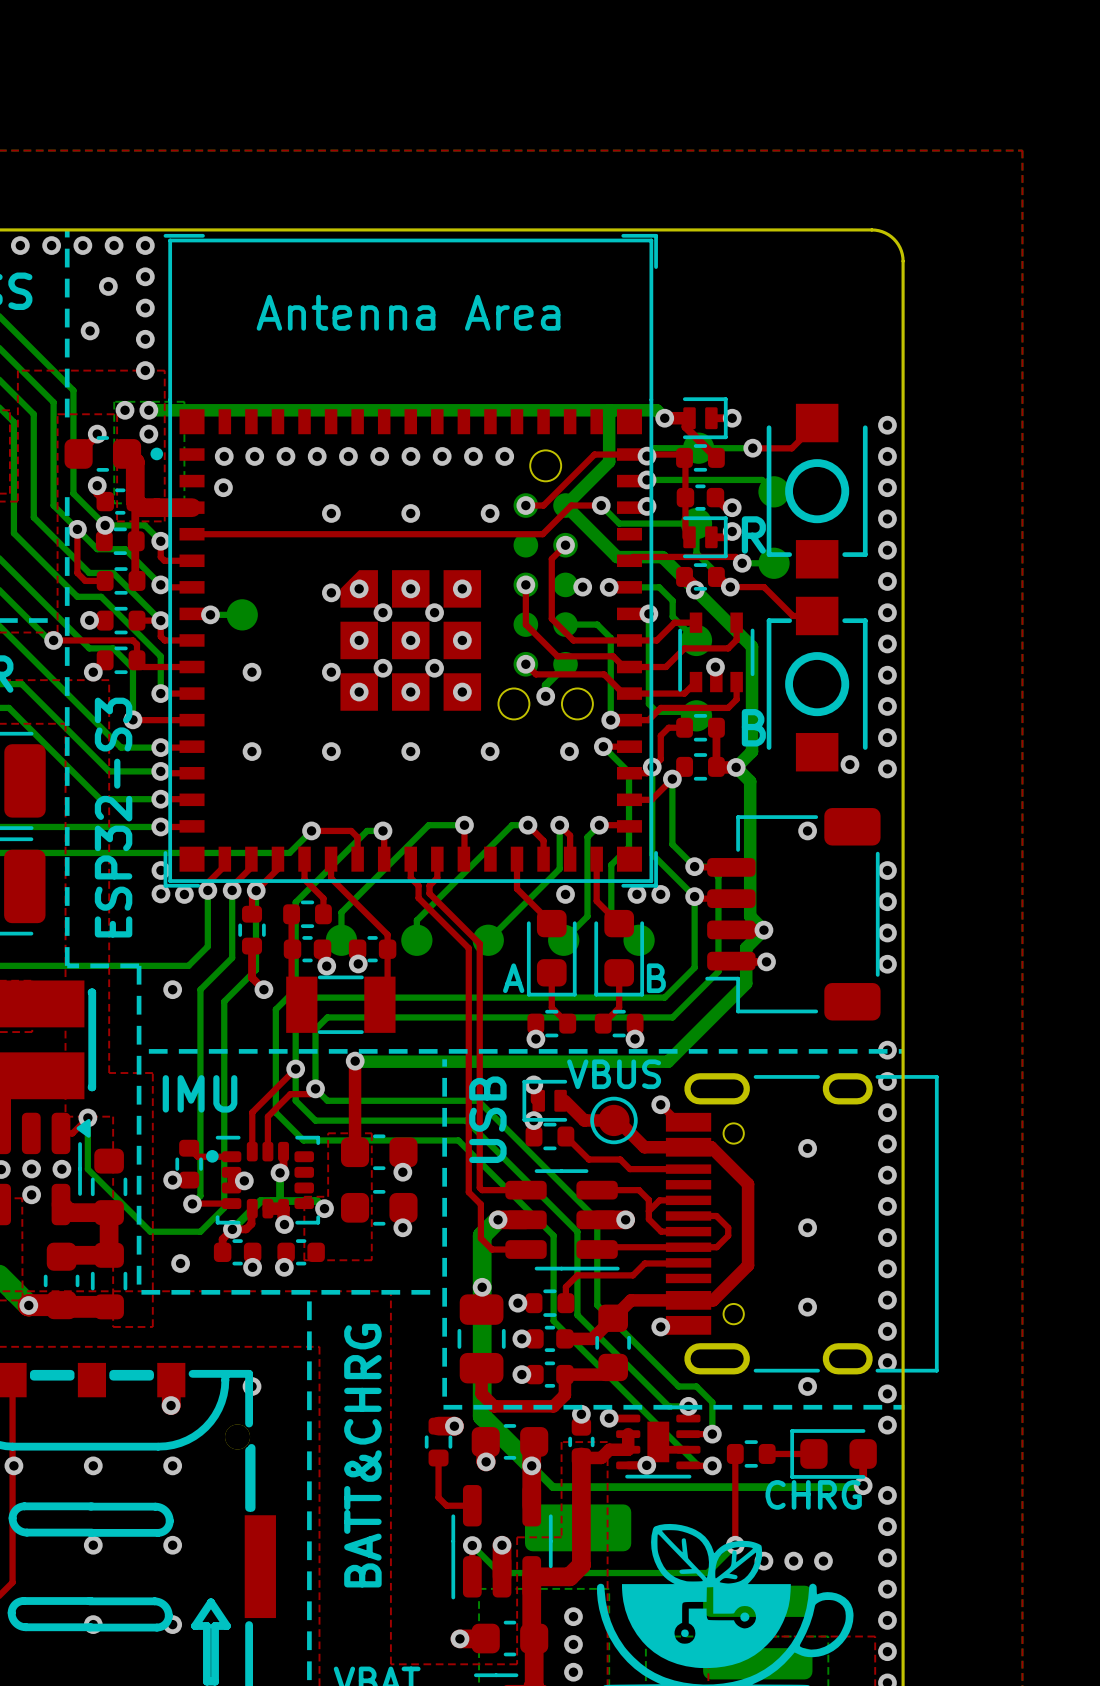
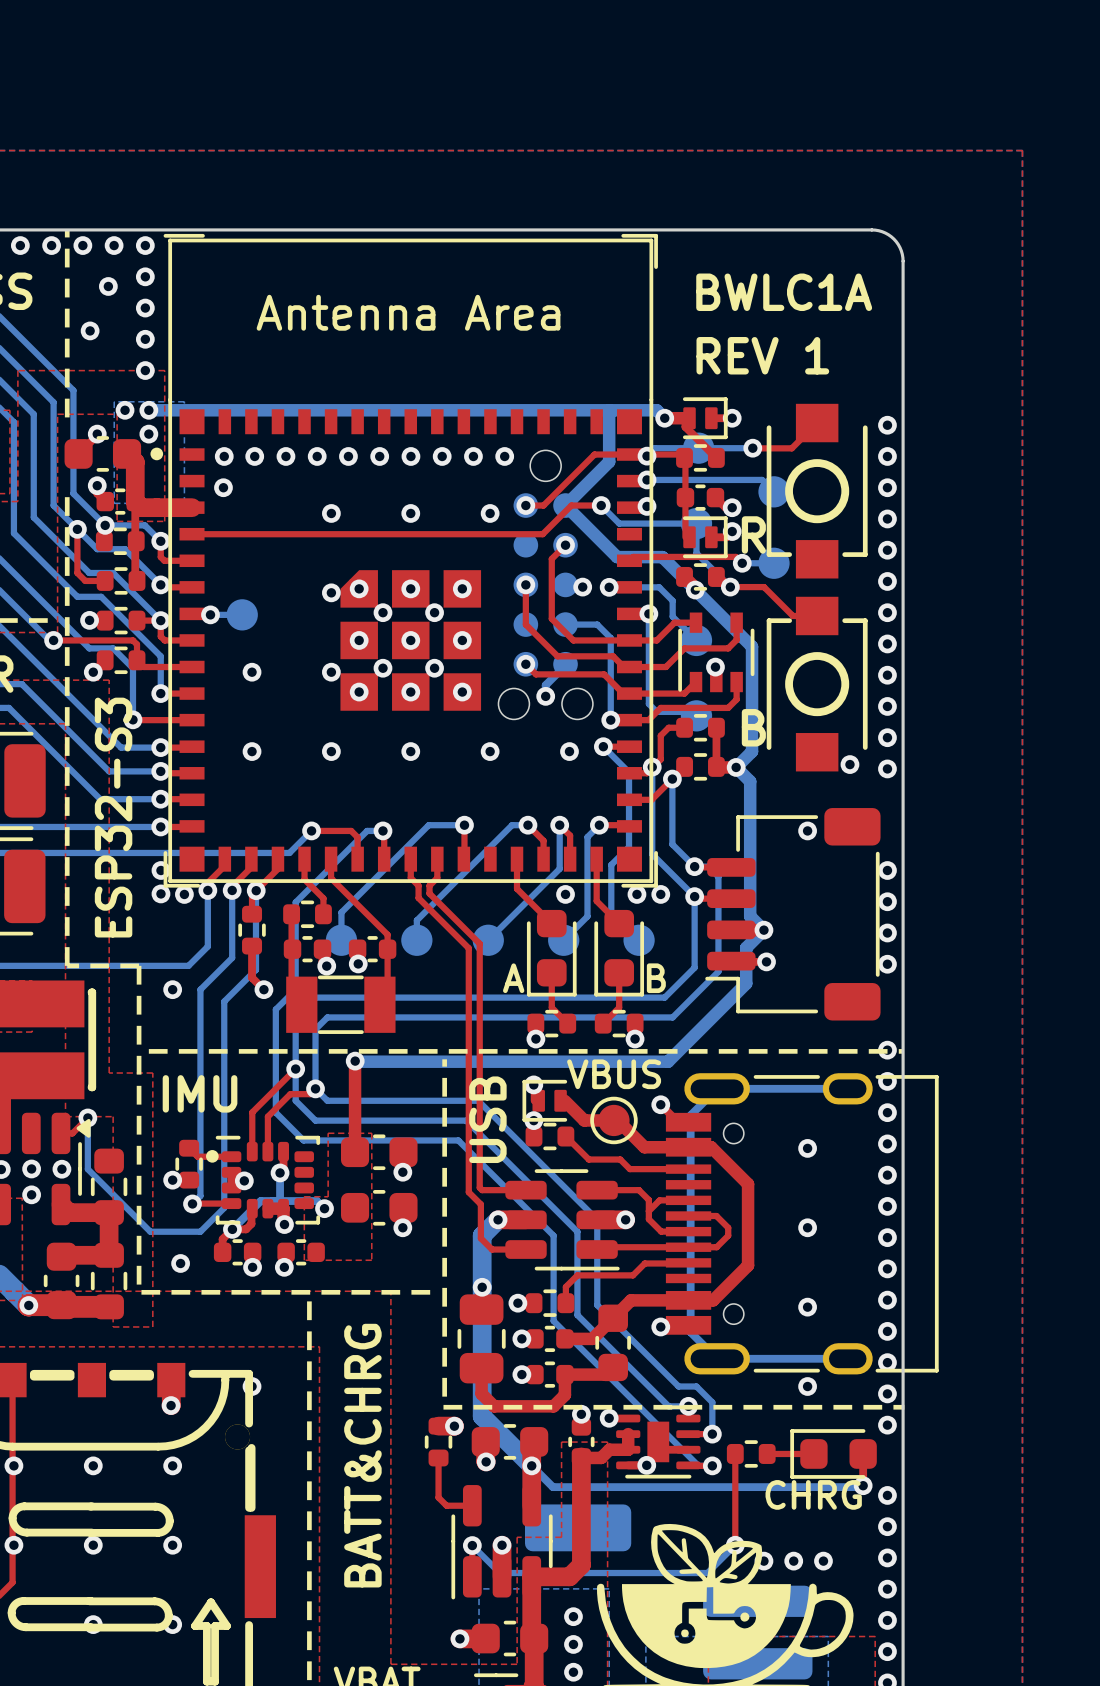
text: none -> BWLC1A (784, 292)
text: none -> REV 1 (762, 355)
bottom track: none -> (847, 1088) (717, 1088) (690, 1115) (690, 1332) (717, 1358) (847, 1358)
via: none -> (13, 1545)

